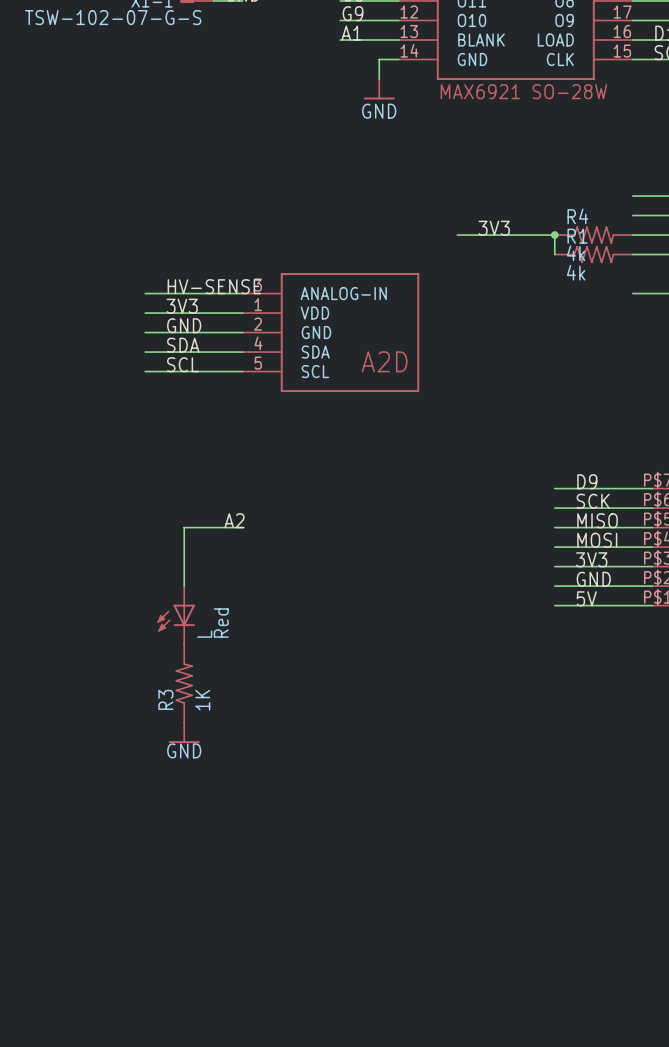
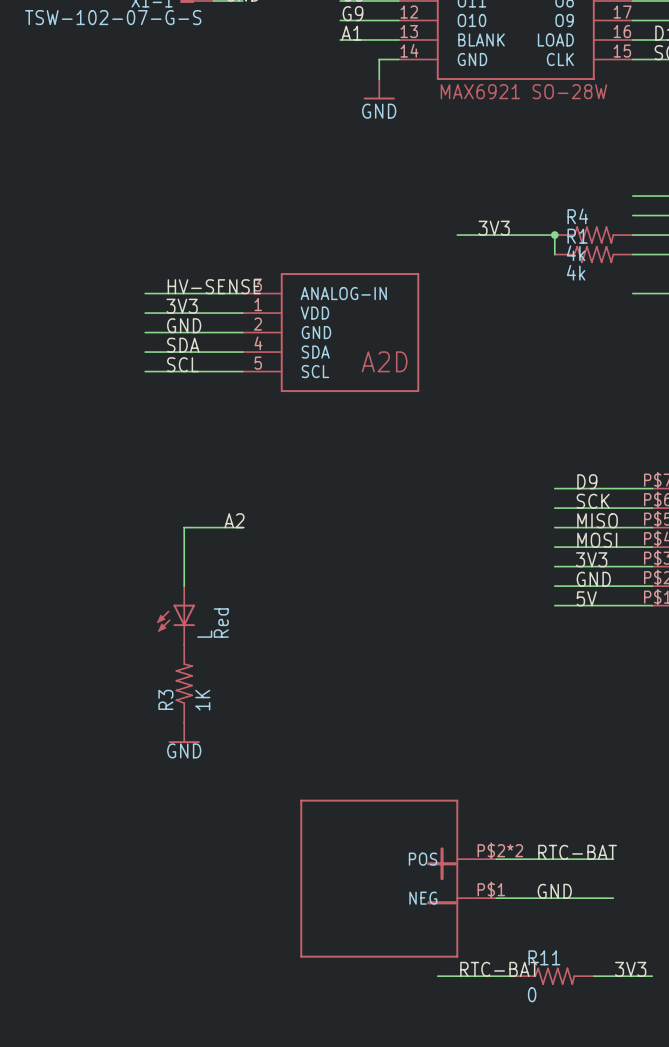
label: none -> RTC-BAT (577, 852)
wire: none -> (496, 859) (613, 859)
part: none -> (398, 878)
label: none -> GND (554, 891)
wire: none -> (496, 898) (613, 898)
label: none -> RTC-BAT (499, 969)
label: none -> 3V3 (630, 969)
wire: none -> (437, 976) (515, 976)
R11: none -> 0 (554, 976)
wire: none -> (593, 976) (652, 976)

